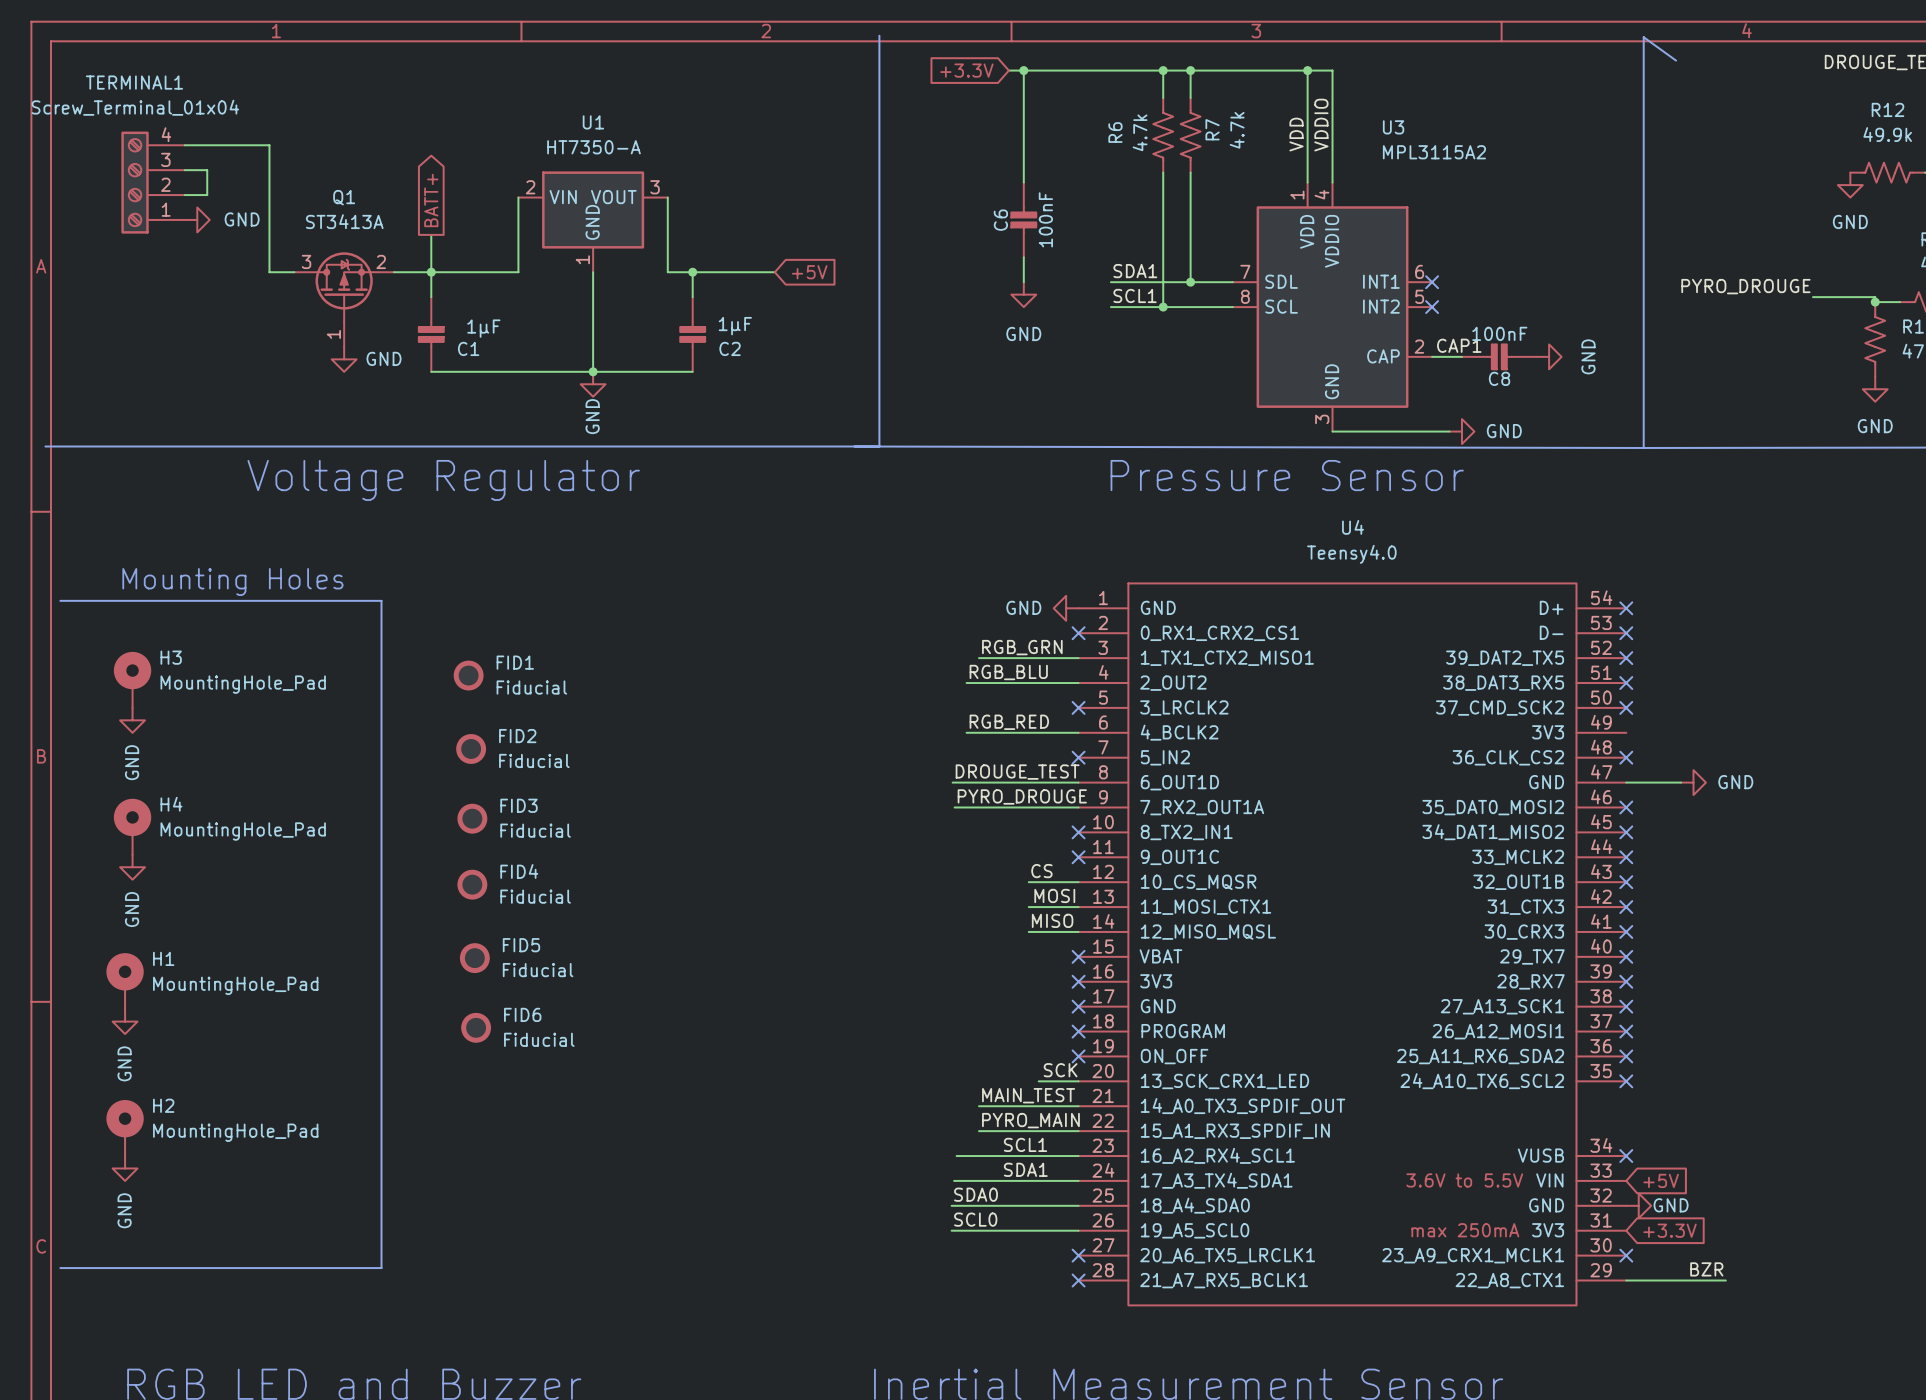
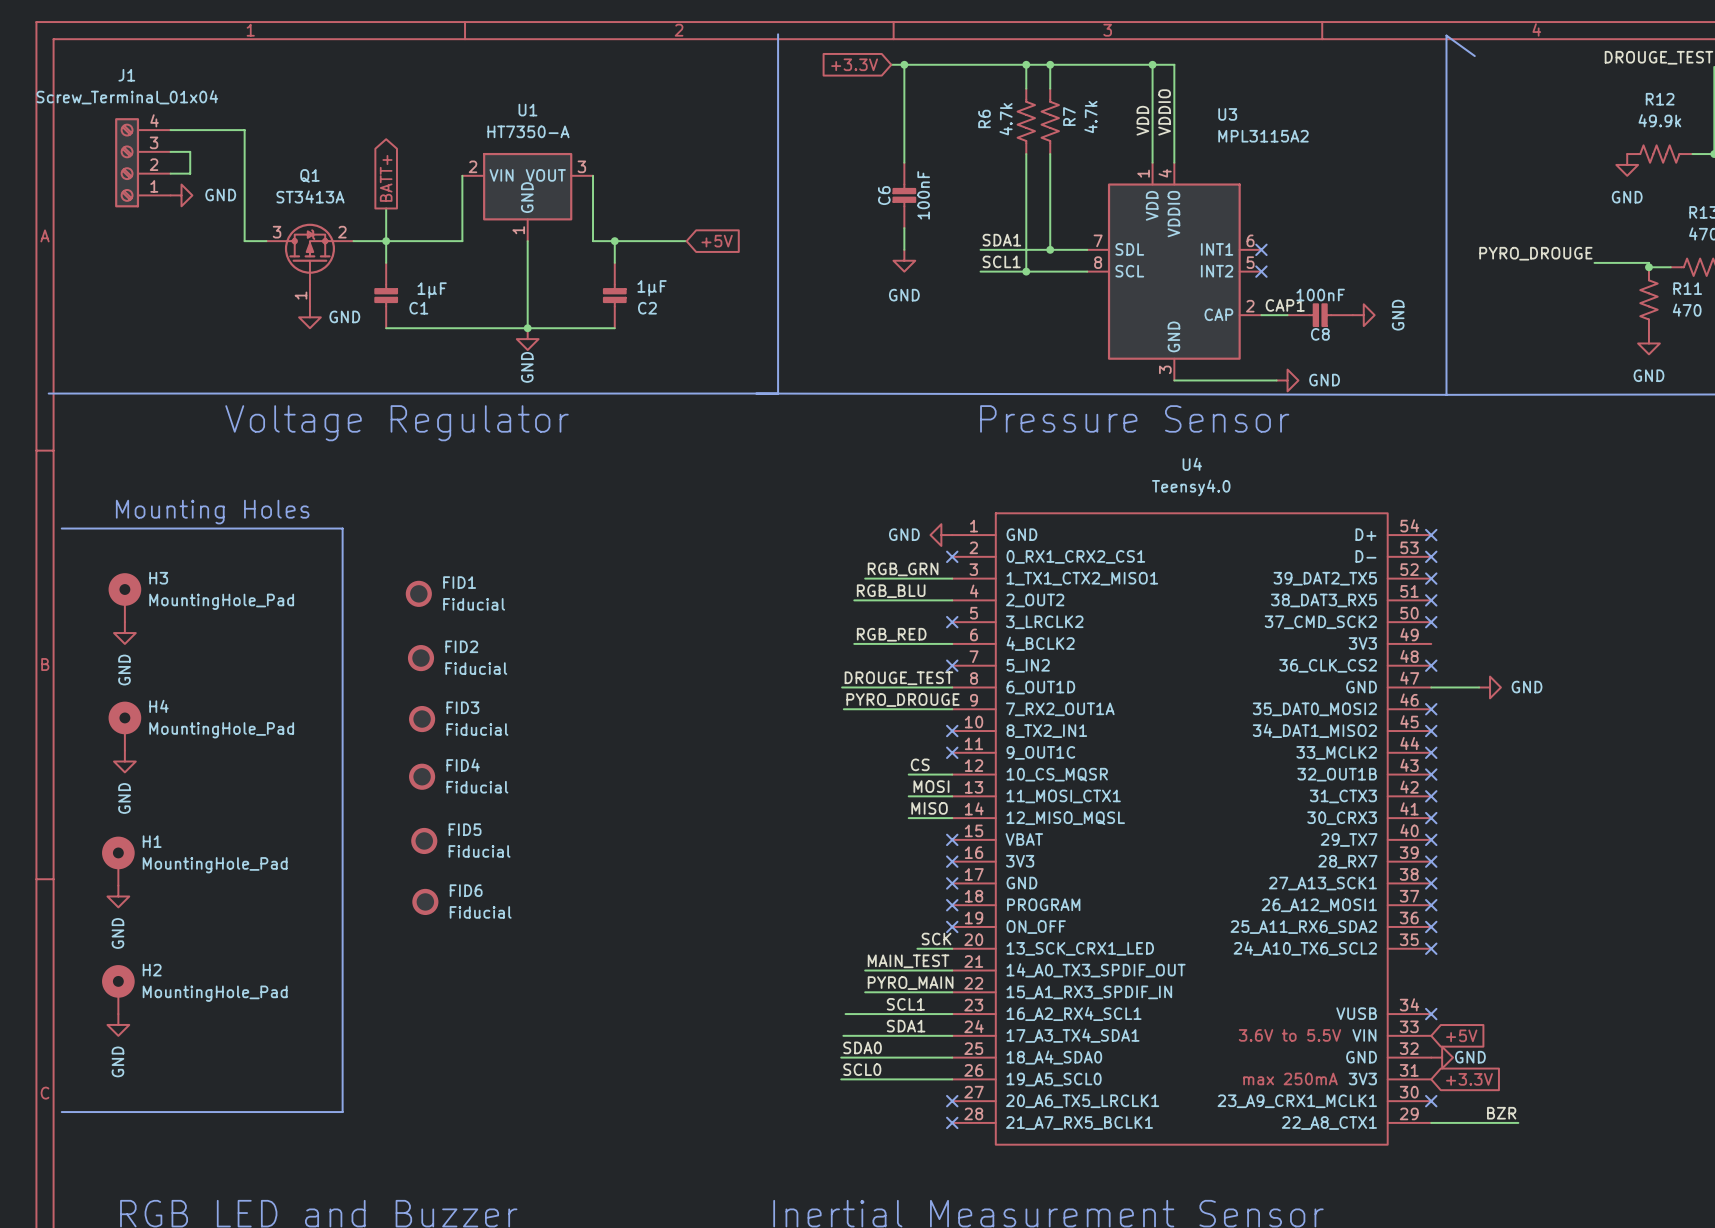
TERMINAL1 name: TERMINAL1 (134, 82) -> J1 (126, 75)

